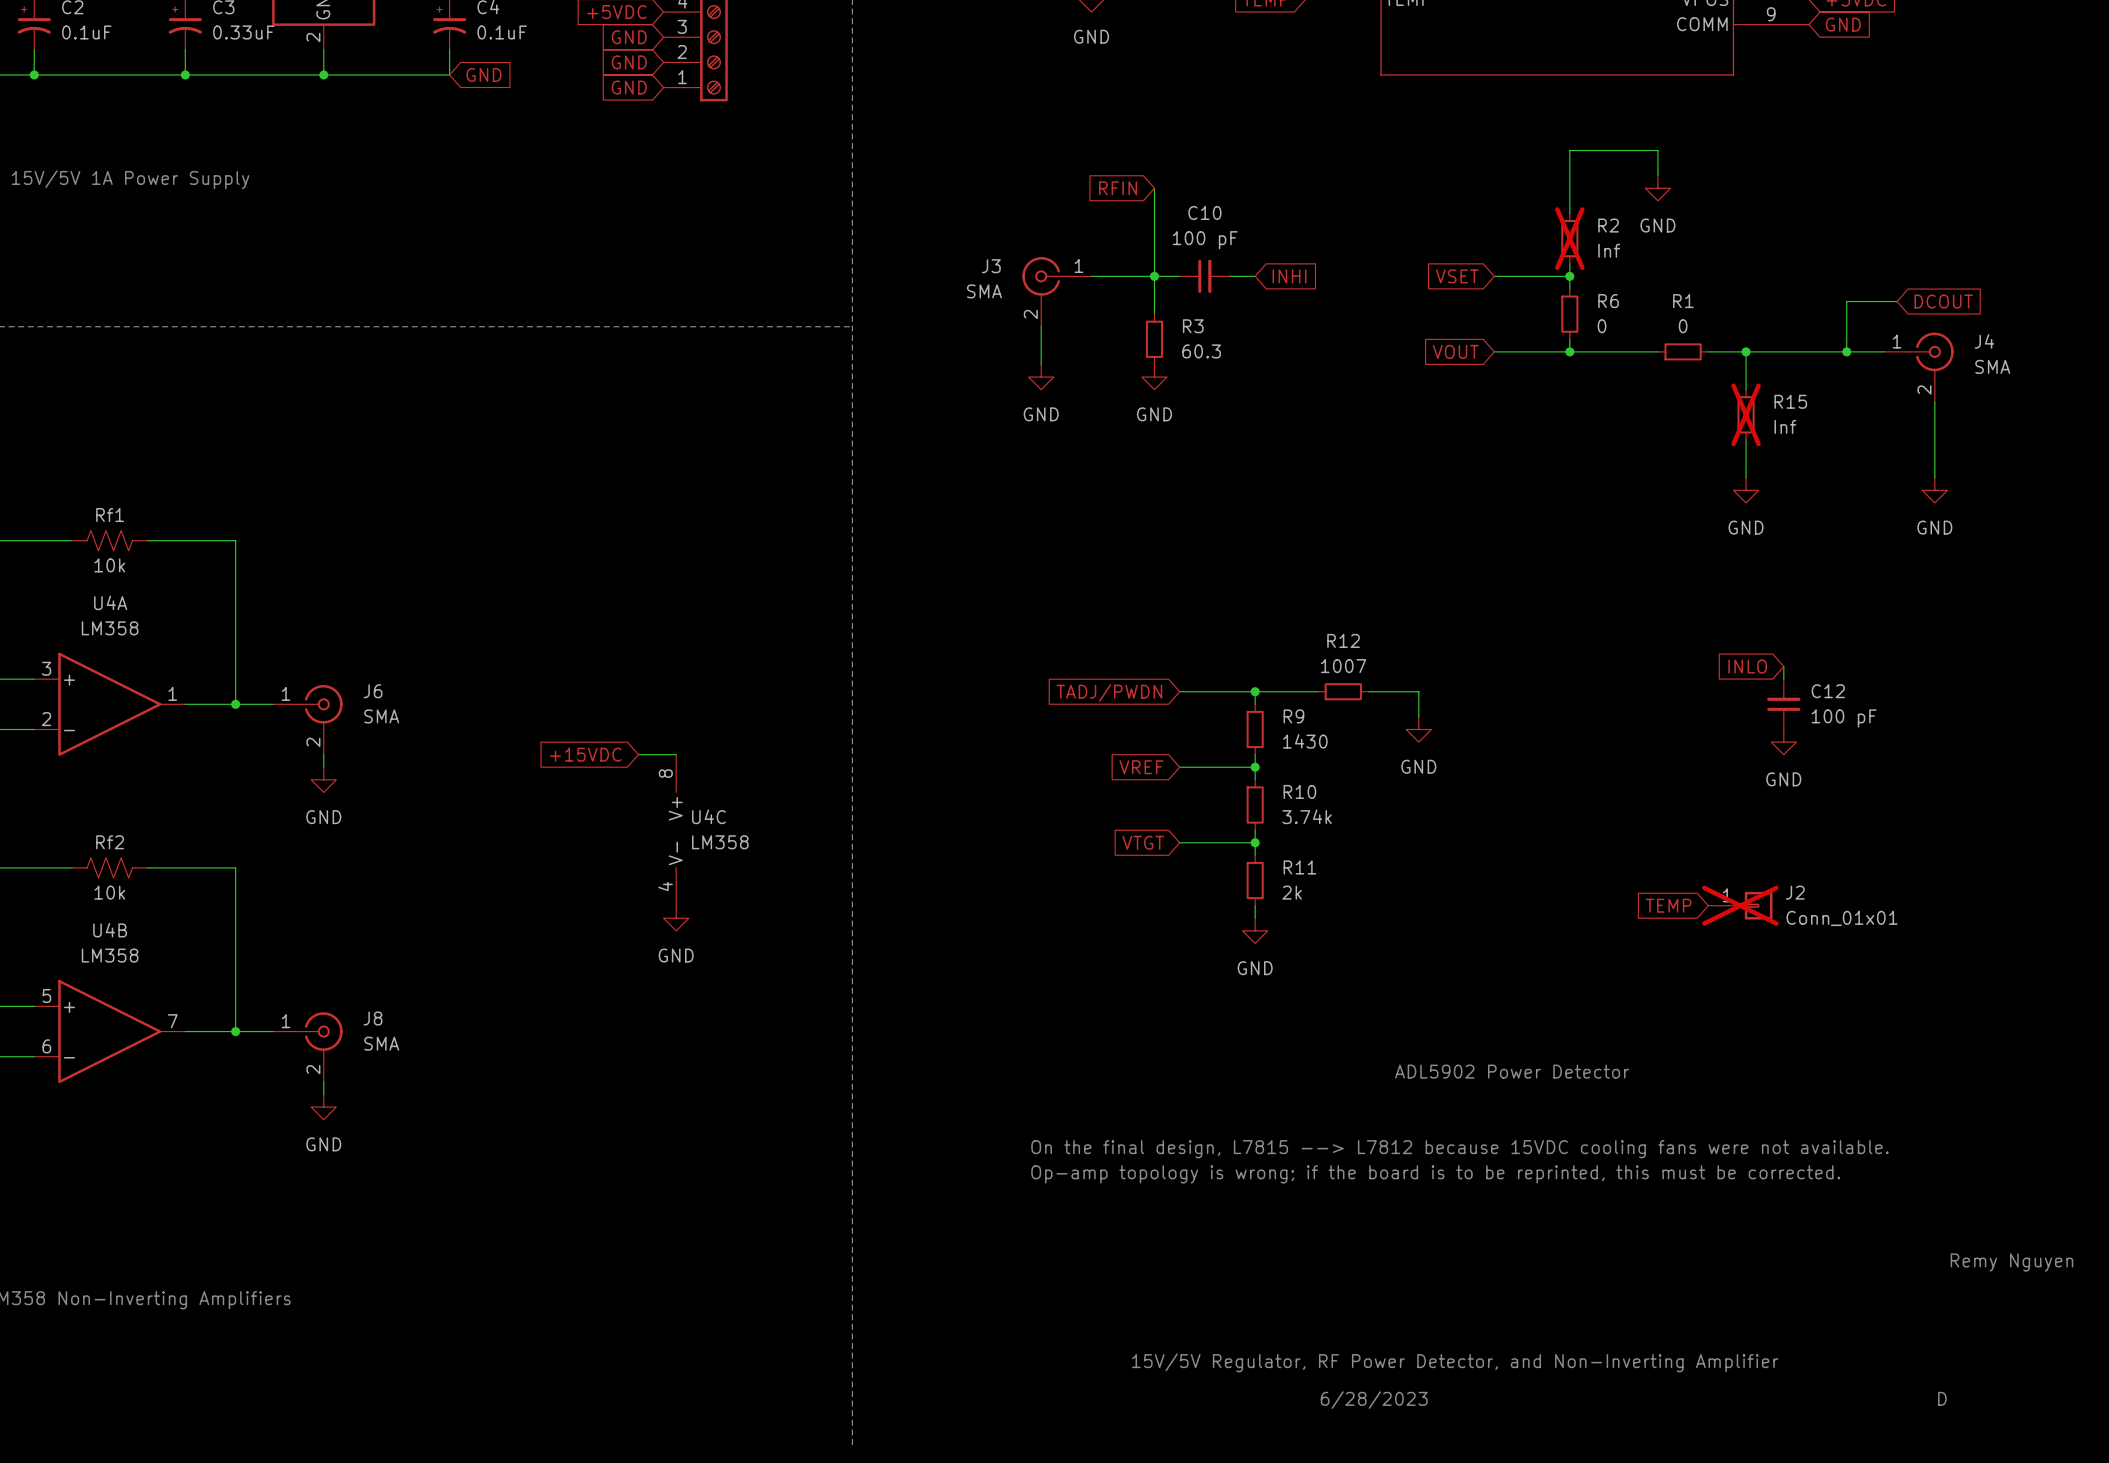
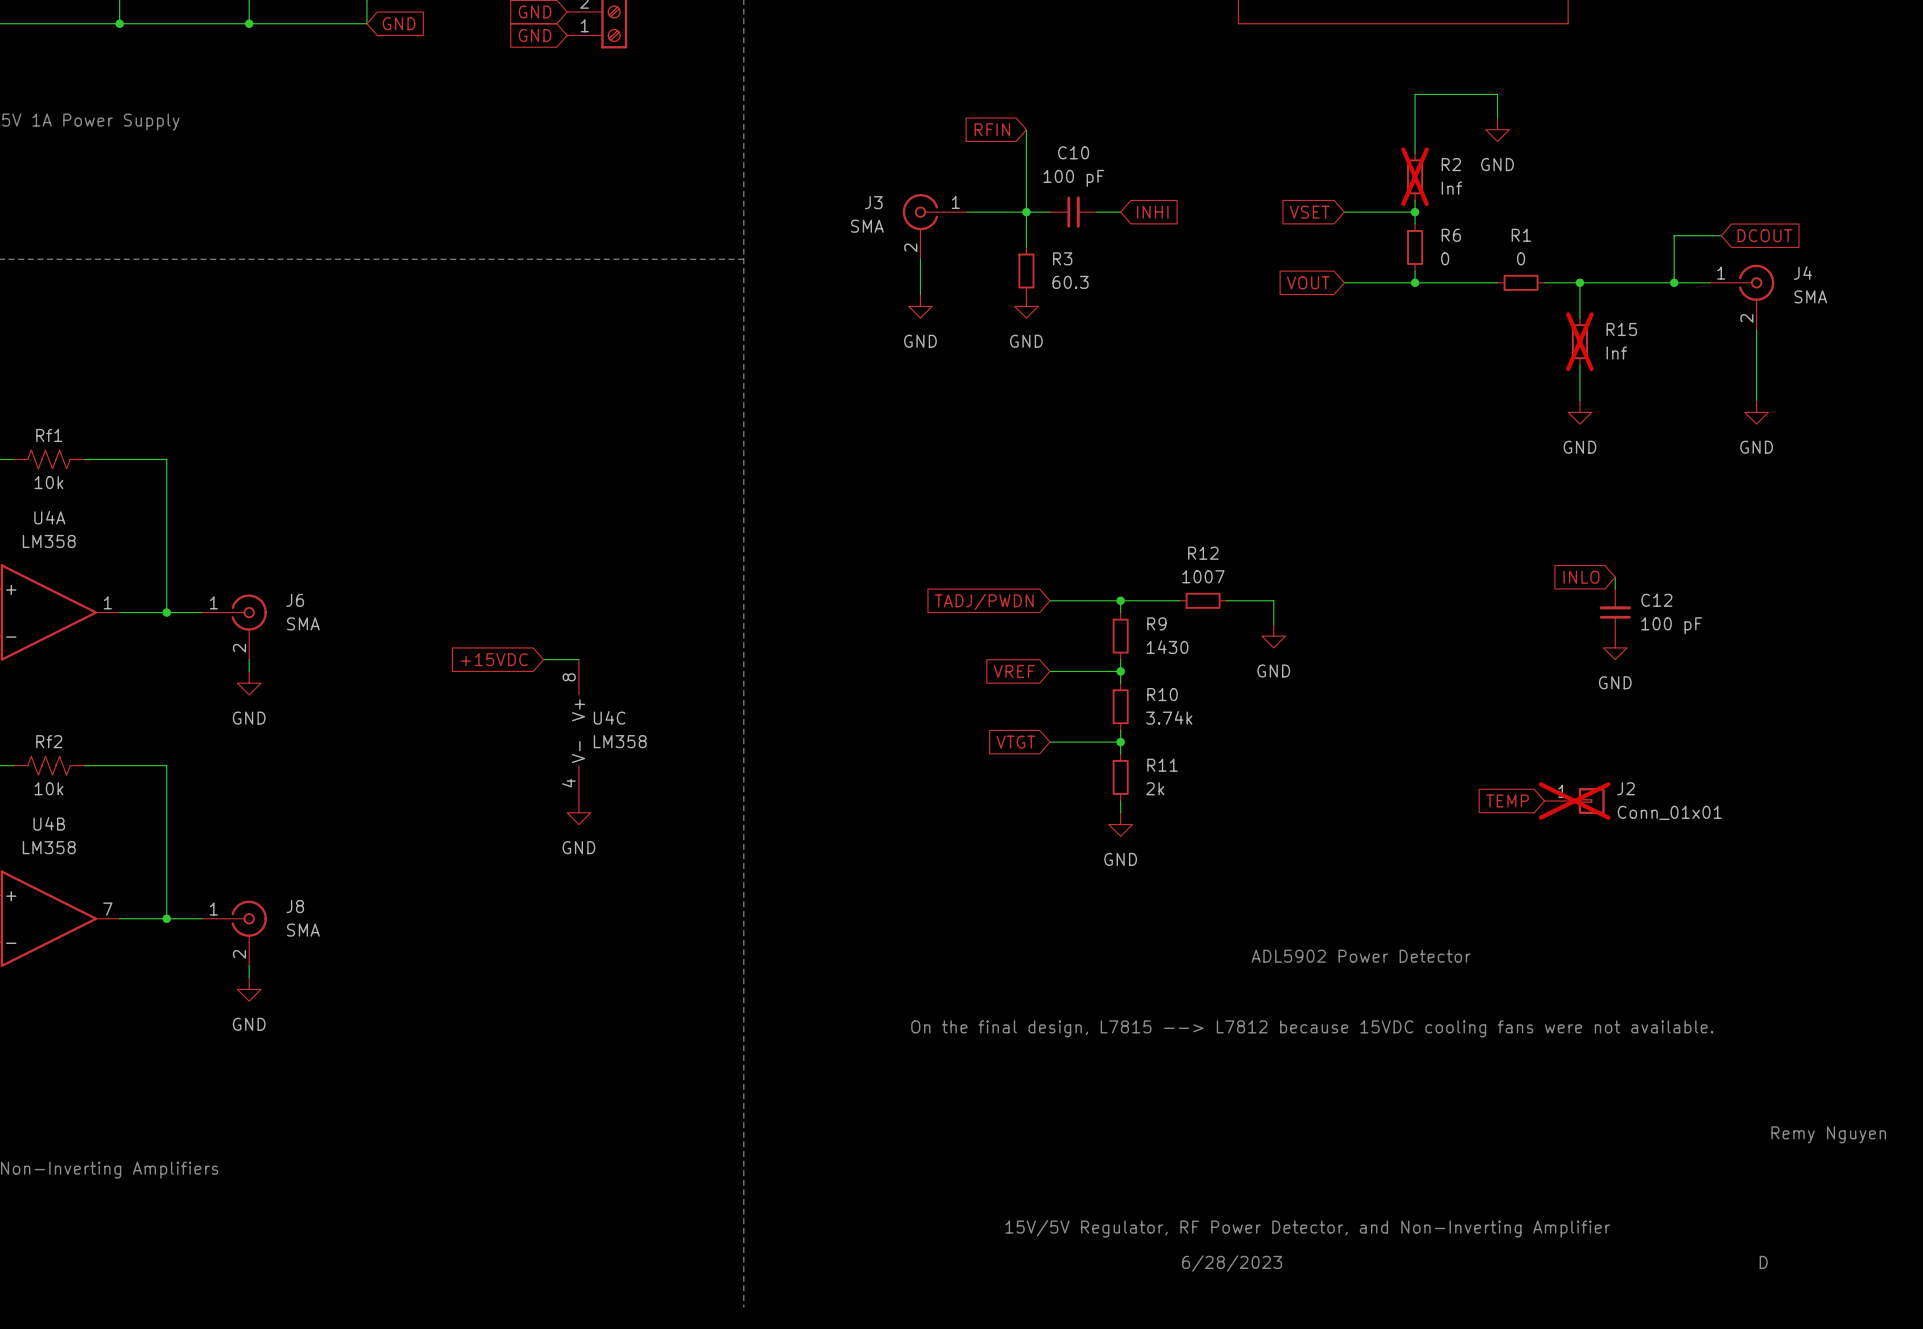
text: Op-amp topology is wrong; if the board is to be reprinted, this must be corrected. (1435, 1174) -> none

